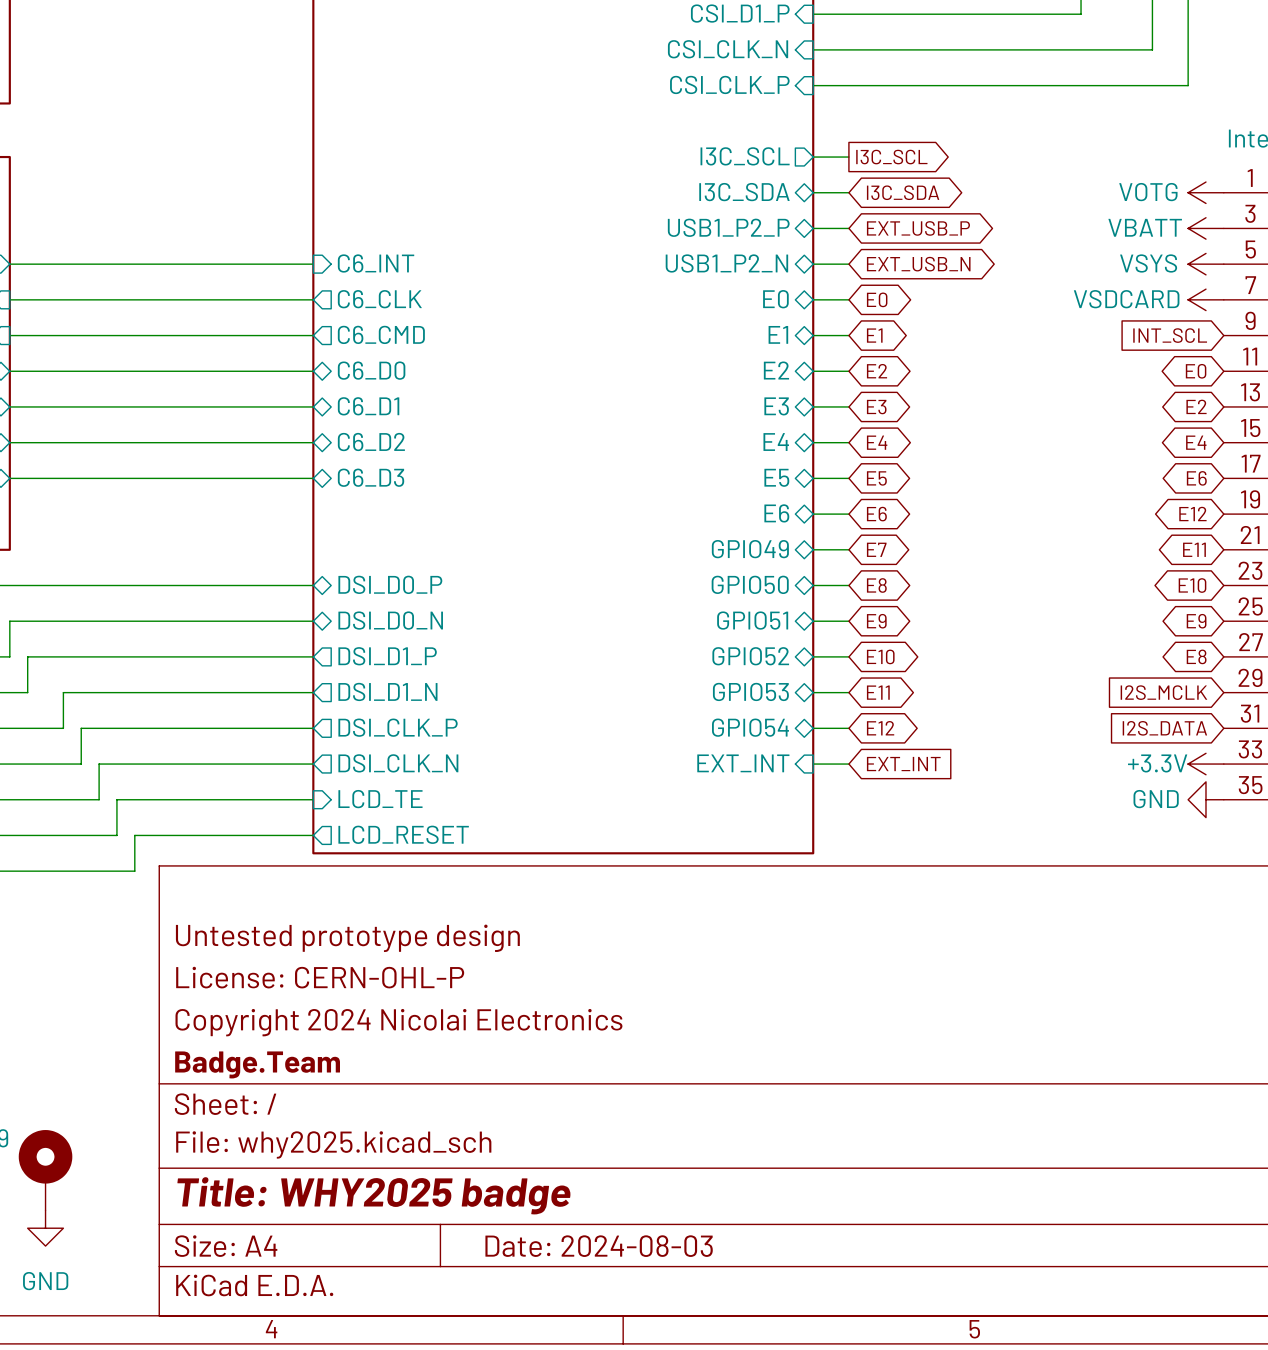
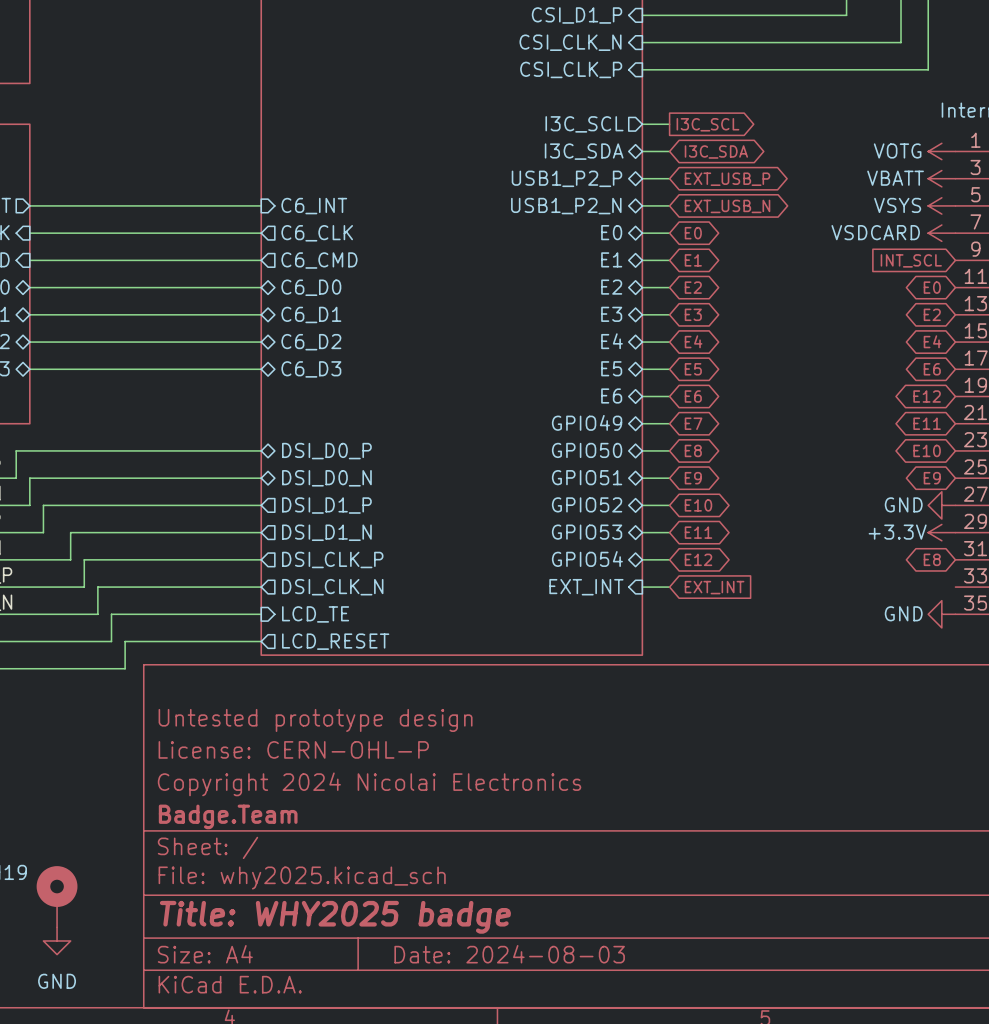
global label: E8 (1196, 656) -> none
power symbol: none -> GND (941, 505)
global label: I2S_MCLK (1163, 692) -> none
global label shape: input (1164, 728) -> bidirectional (932, 559)
global label: I2S_DATA (1164, 728) -> E8 (932, 559)
power symbol position: +3.3V (1205, 764) -> +3.3V (941, 532)

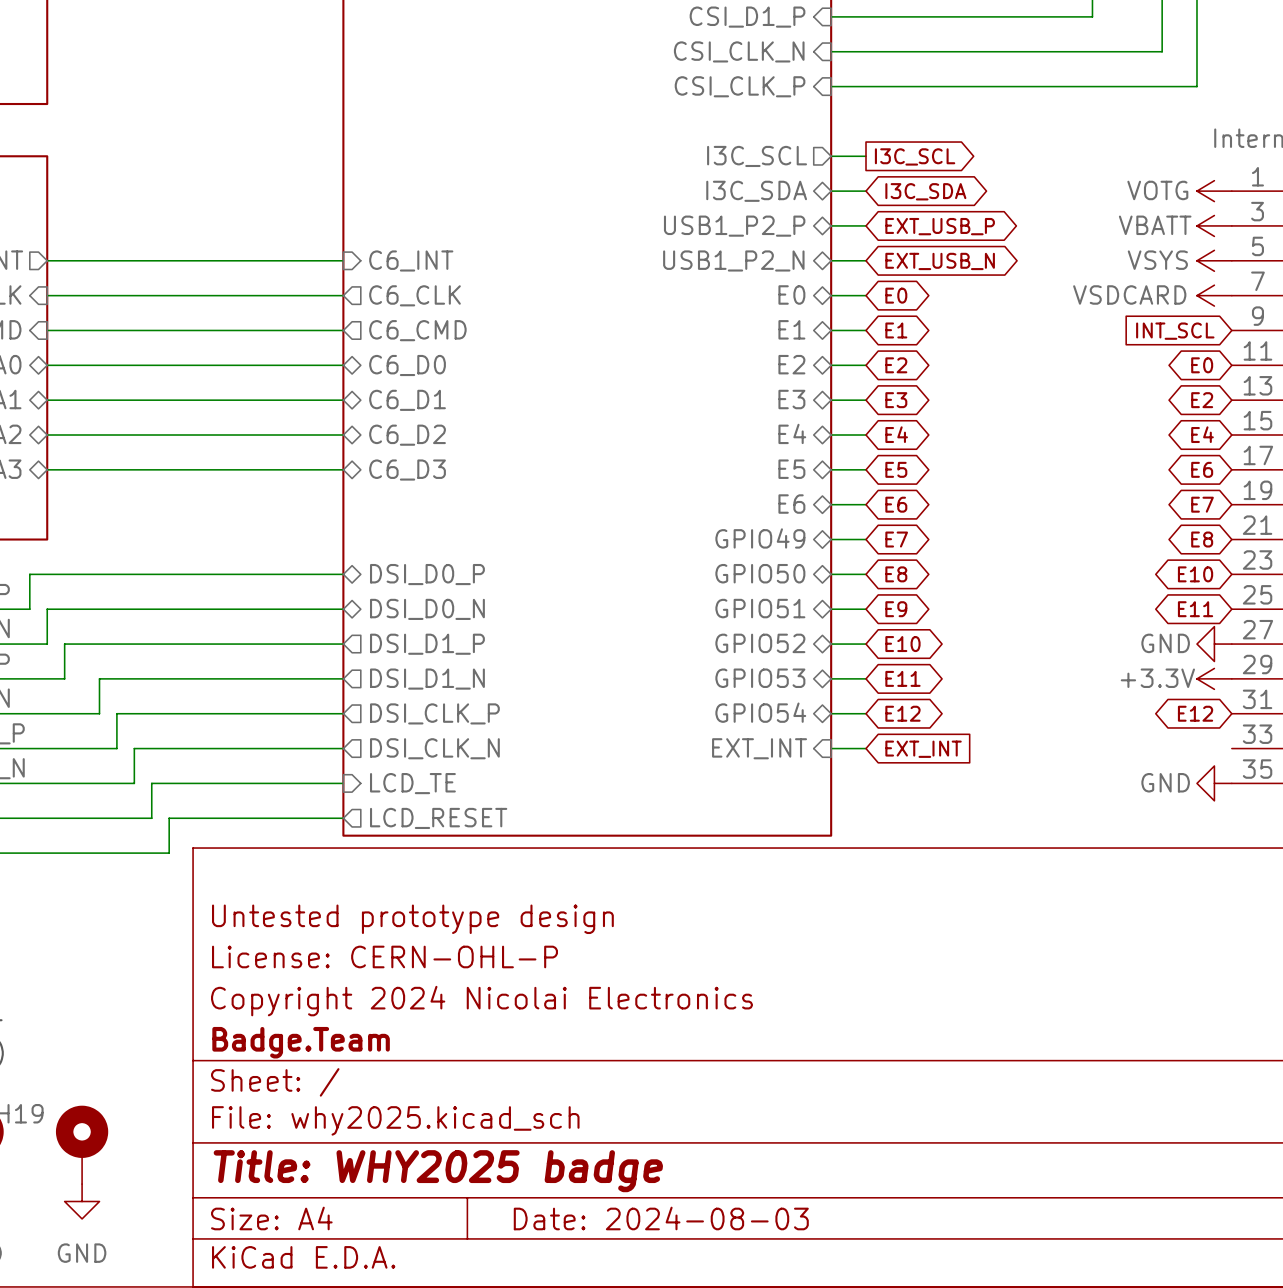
global label: E12 (927, 396) -> E7 (1202, 504)
global label: E11 (927, 423) -> E8 (1202, 539)
global label: E9 (932, 478) -> E11 (1195, 609)
global label: E8 (932, 559) -> E12 (1195, 713)

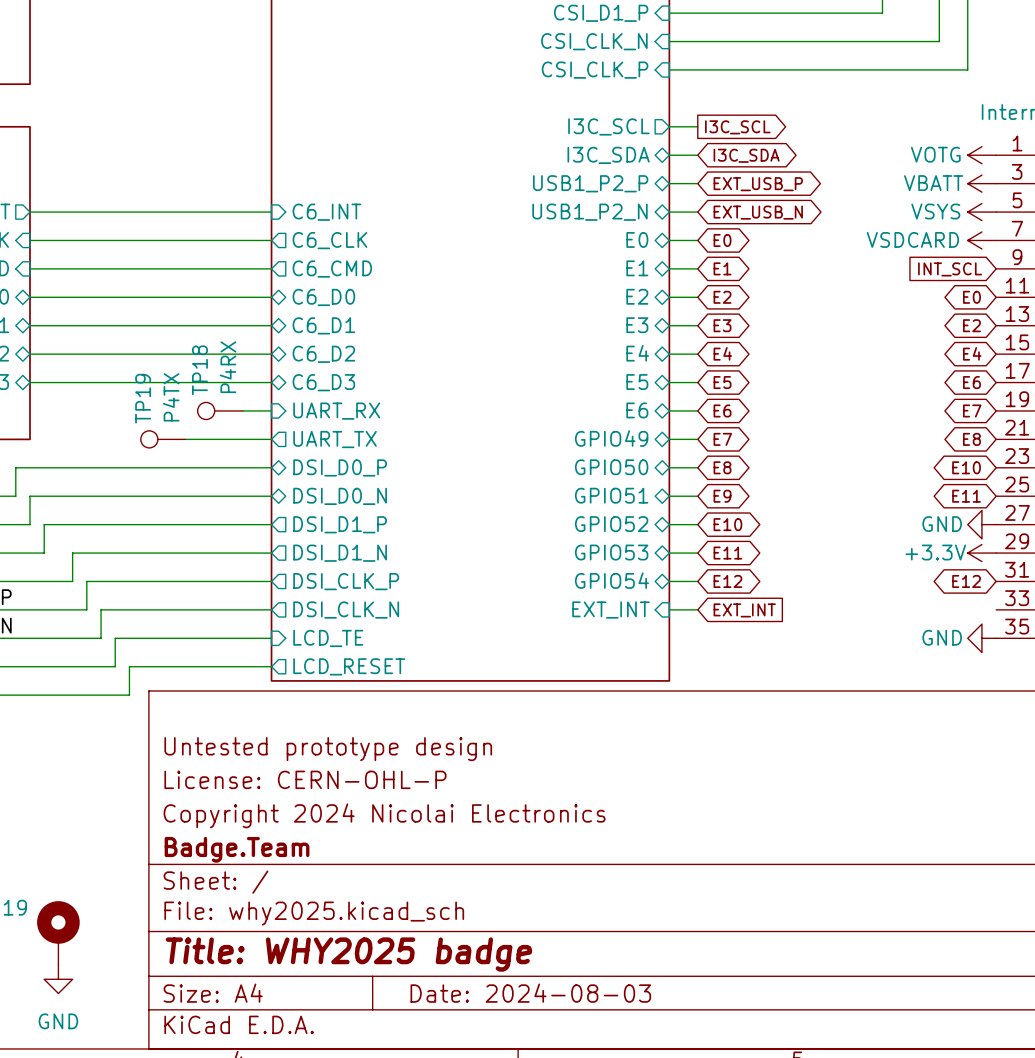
TP18: none -> P4RX (220, 410)
wire: none -> (243, 410) (271, 410)
sheet pin: none -> UART_RX (336, 411)
TP19: none -> P4TX (163, 439)
wire: none -> (186, 439) (271, 439)
sheet pin: none -> UART_TX (335, 439)

